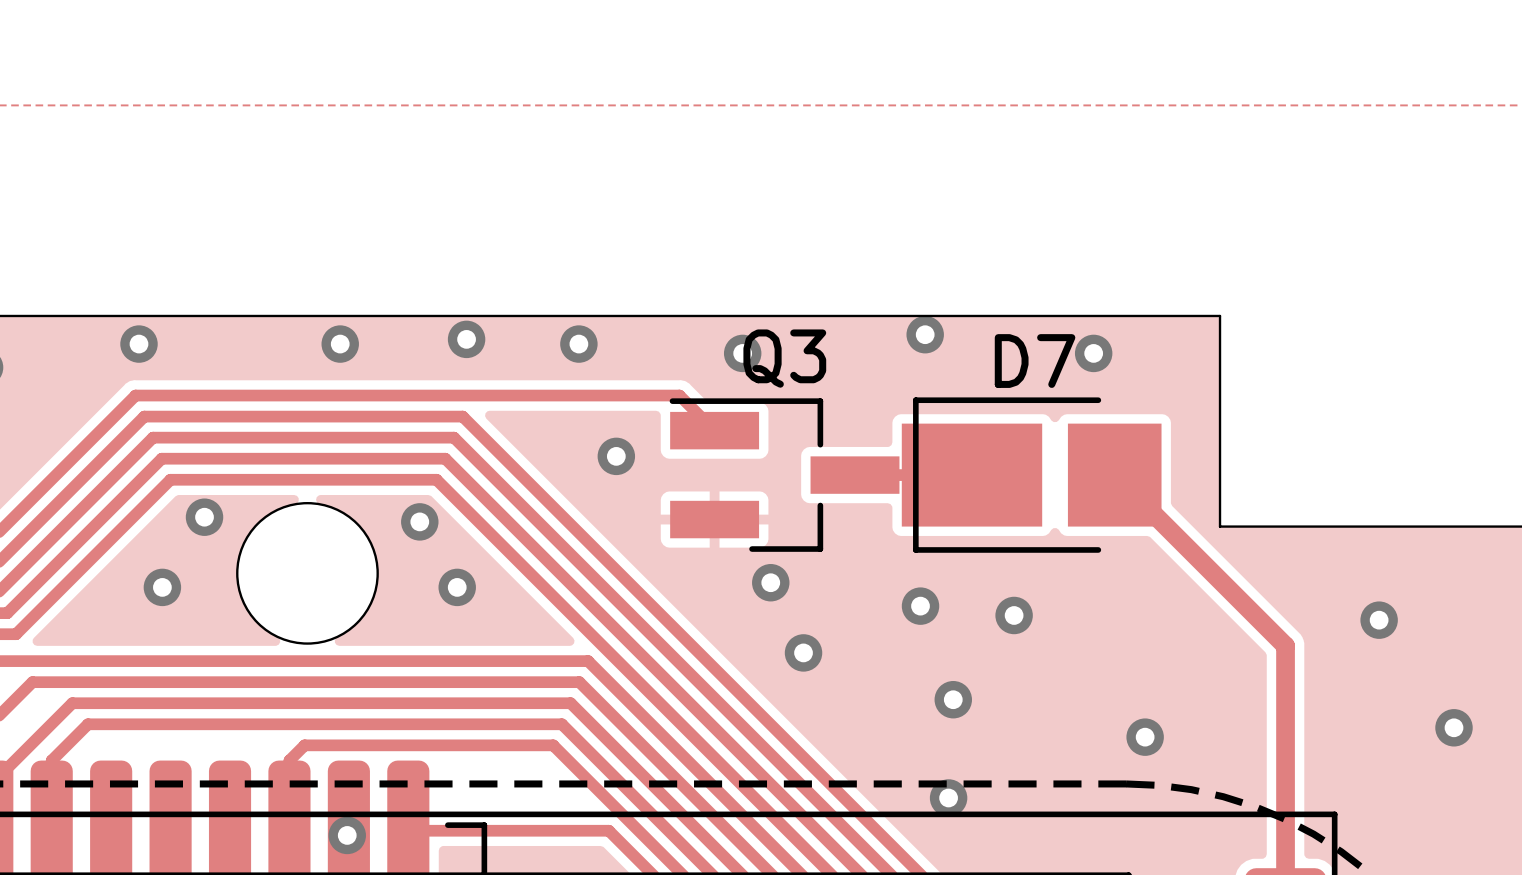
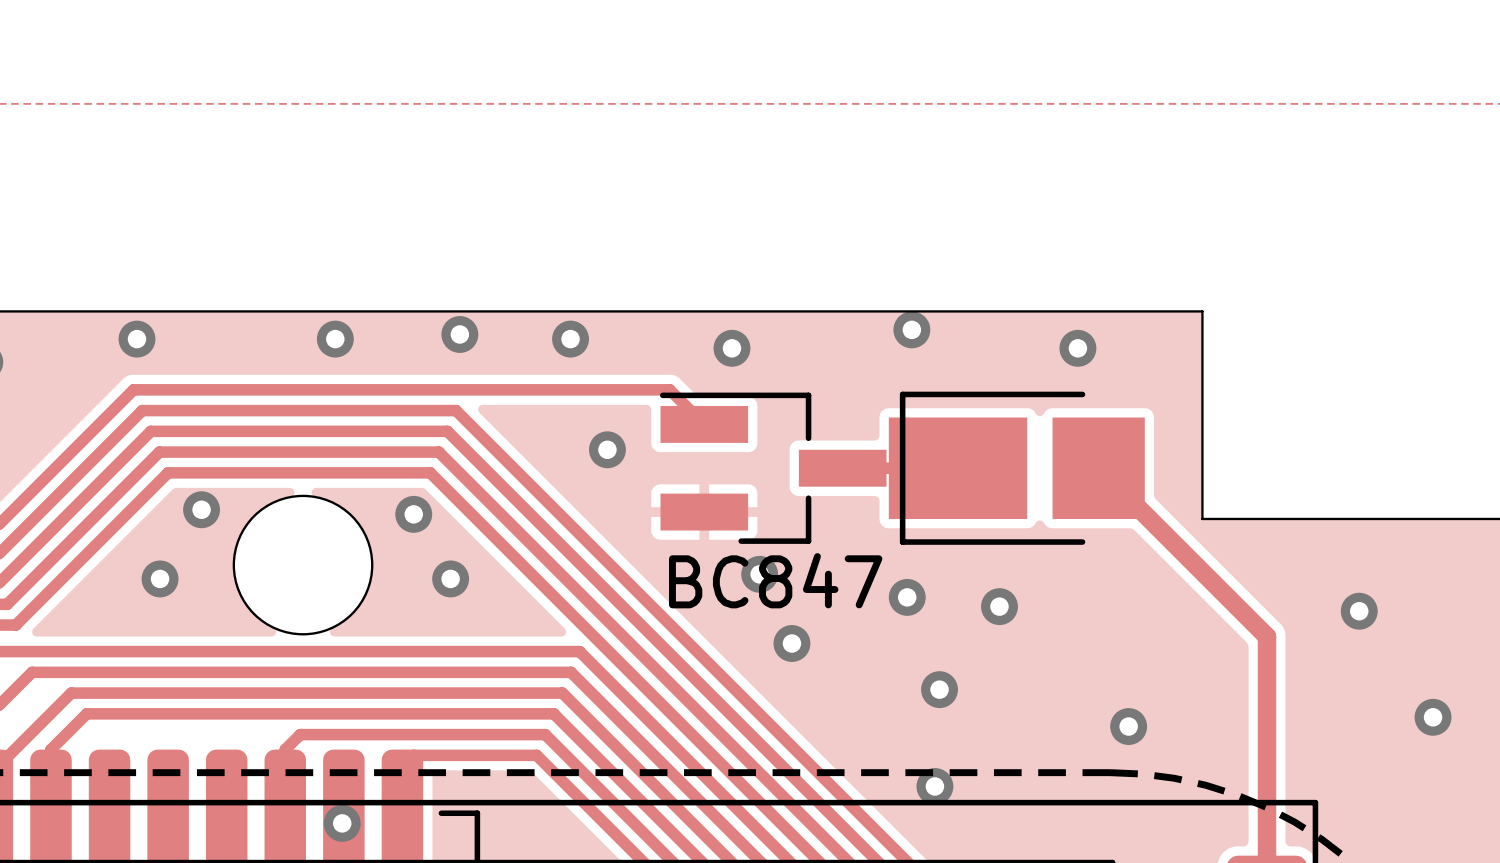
Q3 name: Q3 (784, 358) -> none
D7 name: D7 (1035, 361) -> none
Q3 value: none -> BC847 (775, 580)
track: (408, 830) (608, 830) -> (402, 818) (402, 766) (413, 755) (536, 755) (600, 818)

